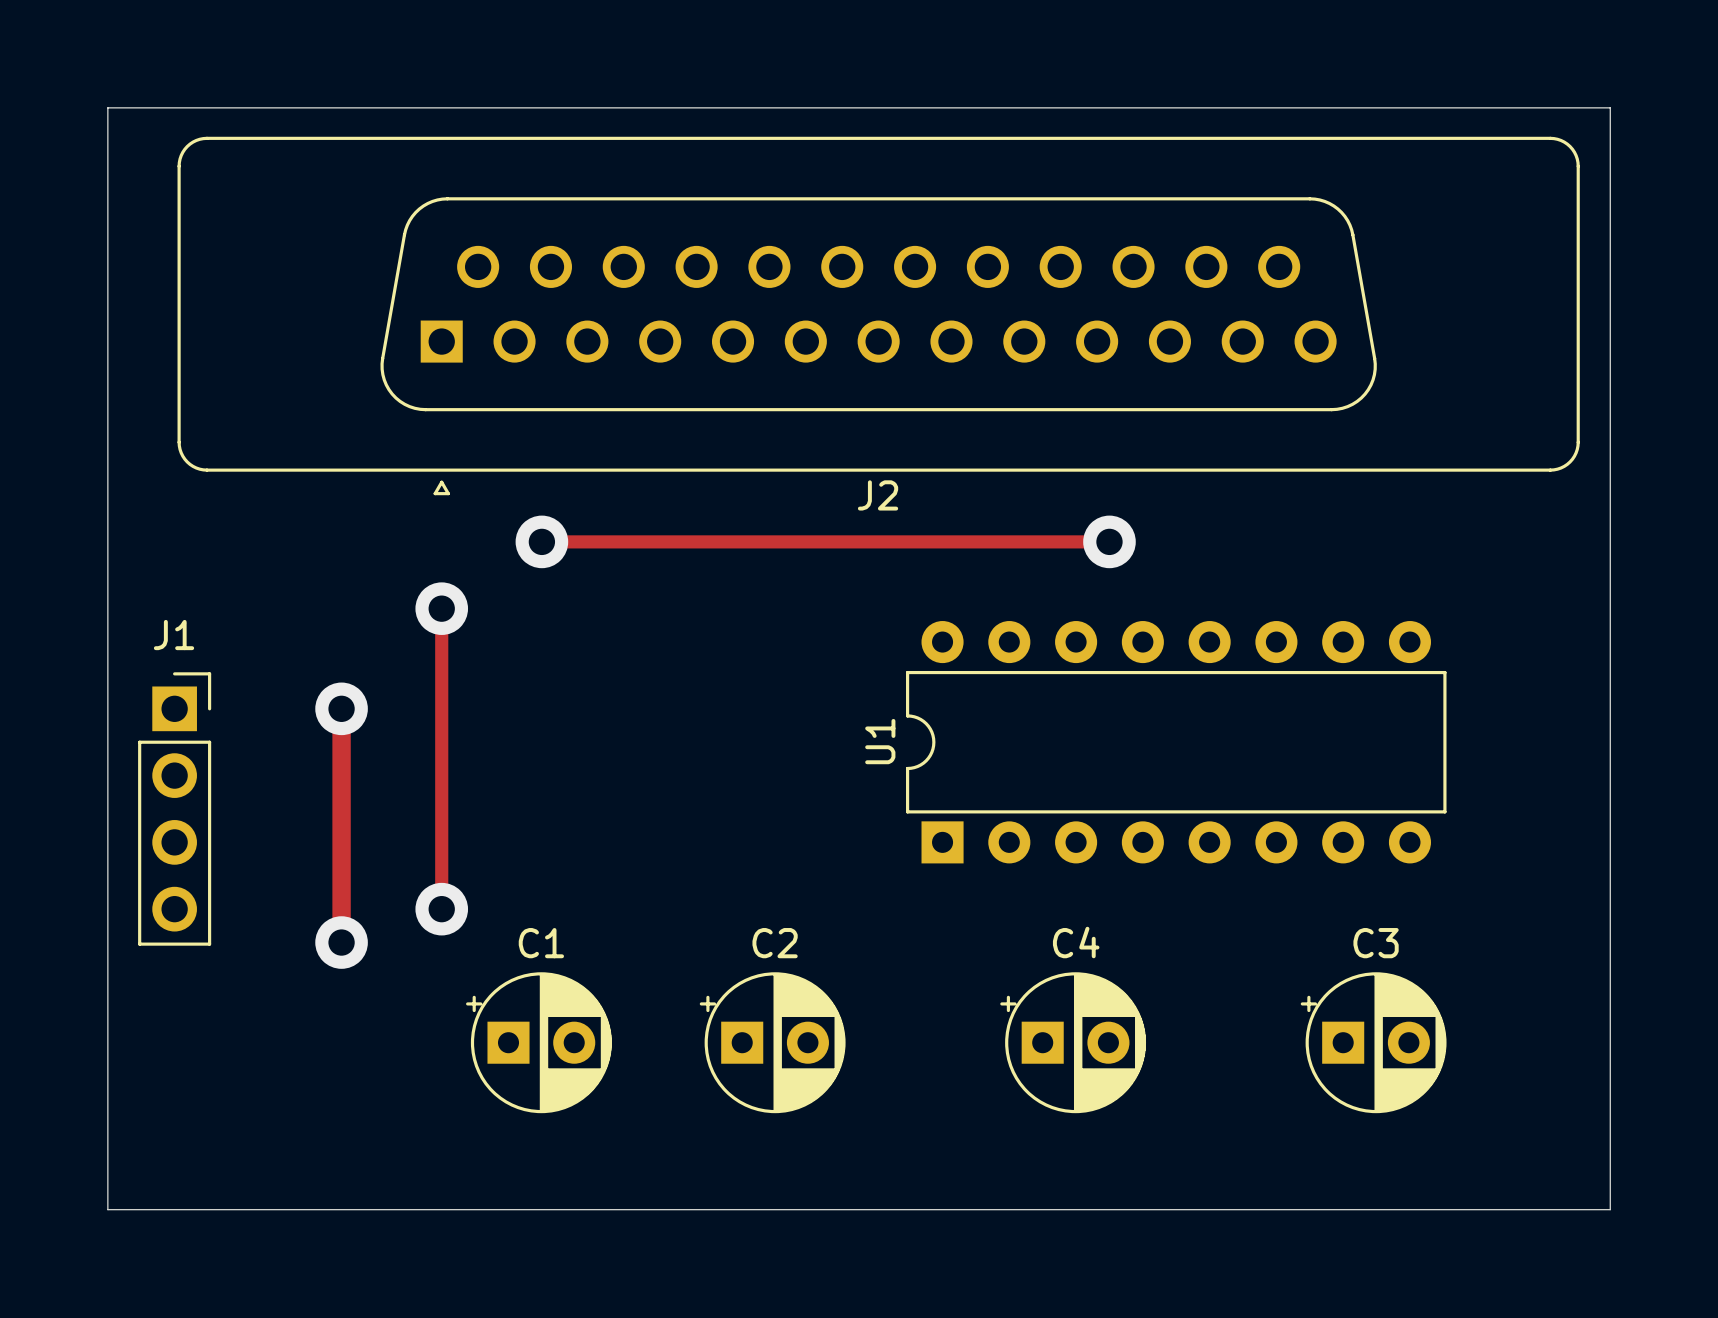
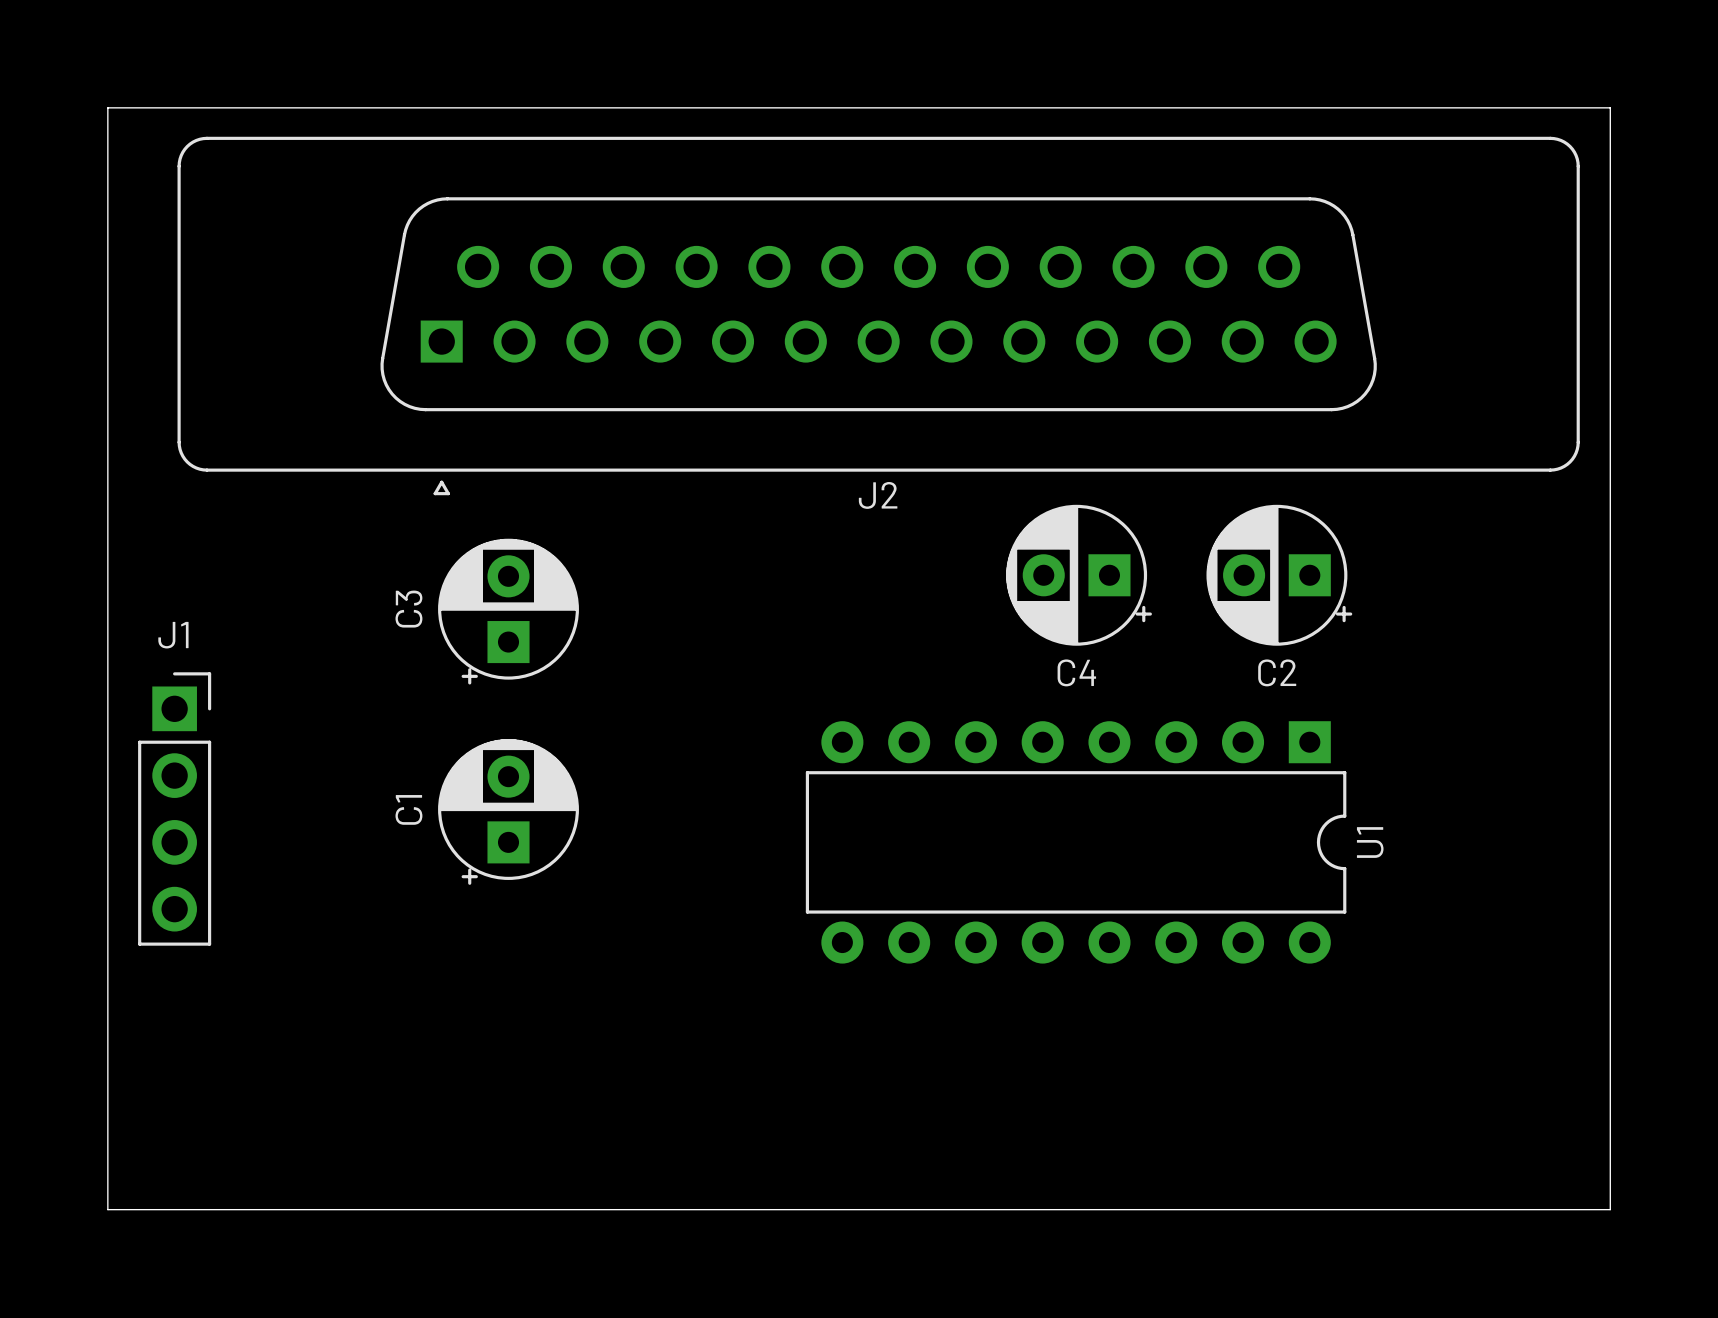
track: (541, 541) (1109, 541) -> none
via: (541, 541) -> none
via: (1109, 541) -> none
track: (441, 608) (441, 909) -> none
via: (441, 608) -> none
track: (341, 708) (341, 942) -> none
via: (341, 708) -> none
U1 rotation: 0° (1176, 742) -> 180° (1076, 842)
via: (441, 909) -> none
via: (341, 942) -> none
C1 rotation: 0° (538, 1042) -> 90° counterclockwise (508, 811)
C1 position: (538, 1042) -> (508, 811)
C2 rotation: 0° (772, 1042) -> 180° (1279, 575)
C2 position: (772, 1042) -> (1279, 575)
C4 rotation: 0° (1073, 1042) -> 180° (1079, 575)
C4 position: (1073, 1042) -> (1079, 575)
C3 rotation: 0° (1373, 1042) -> 90° counterclockwise (508, 611)
C3 position: (1373, 1042) -> (508, 611)

